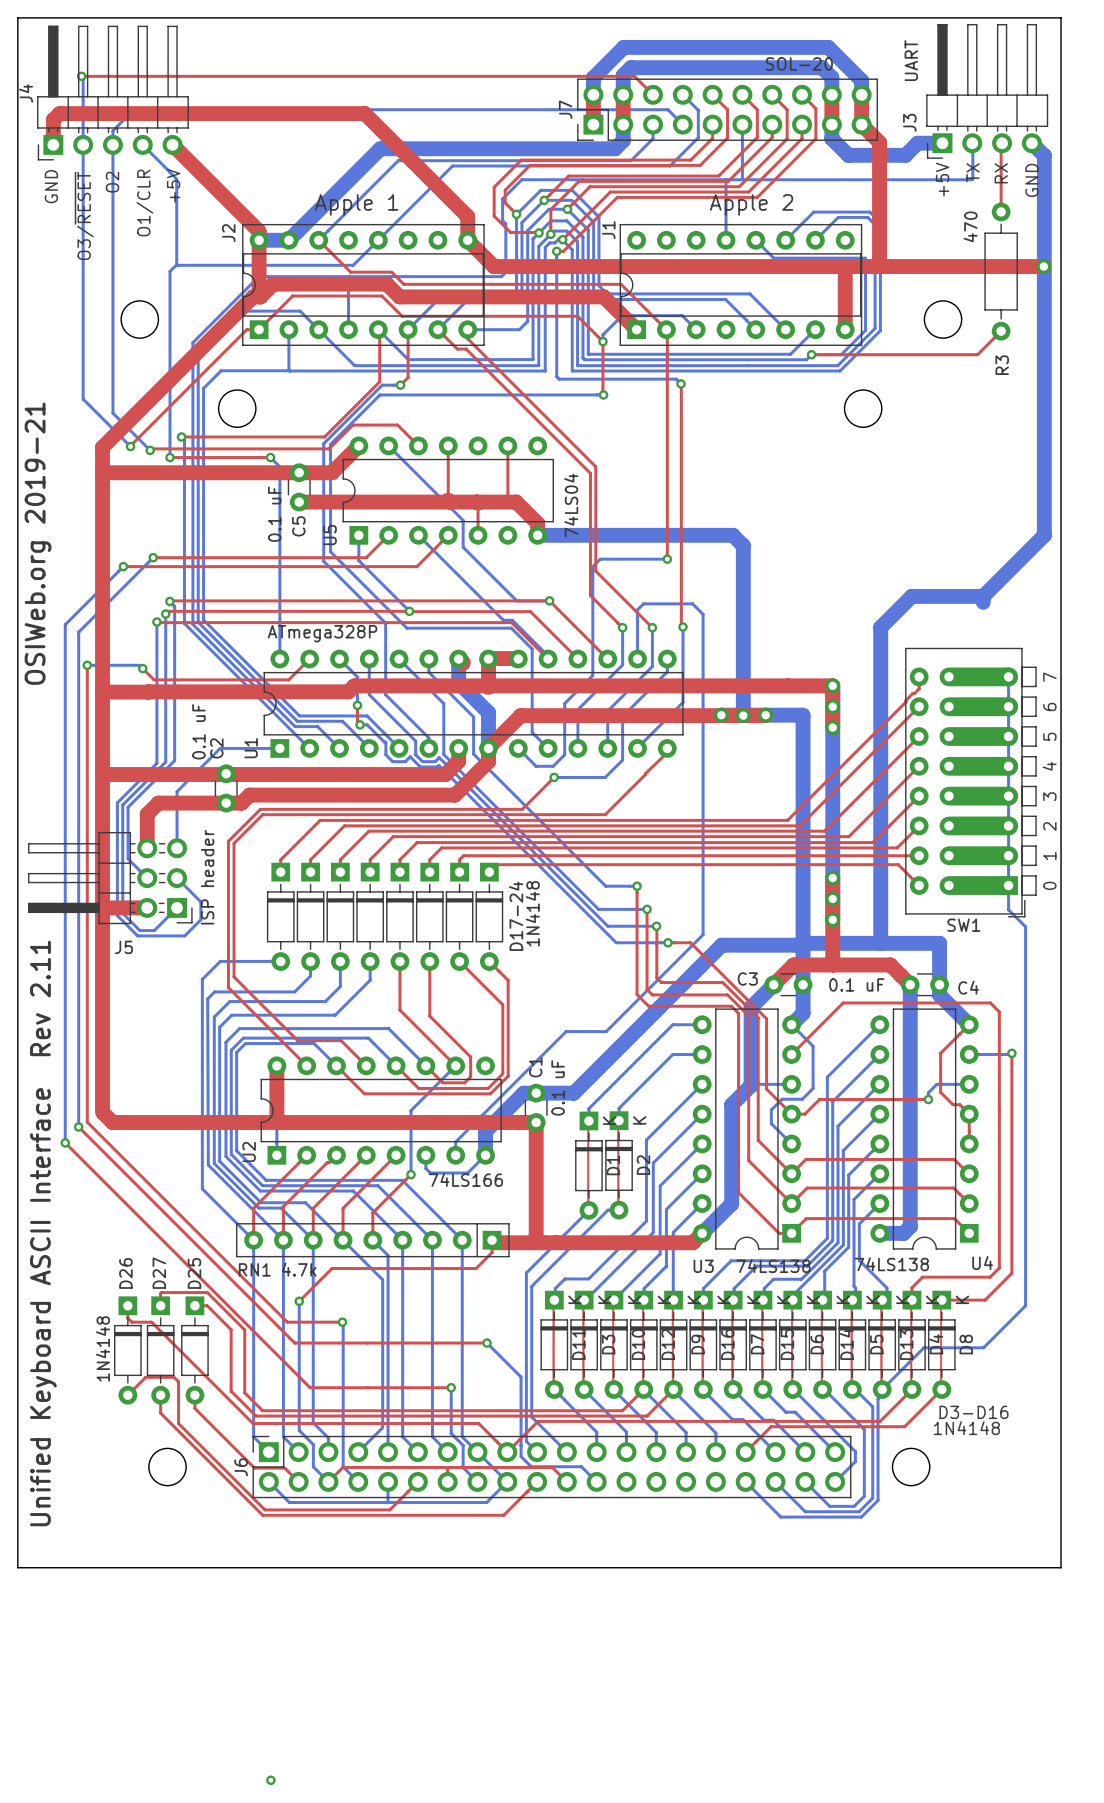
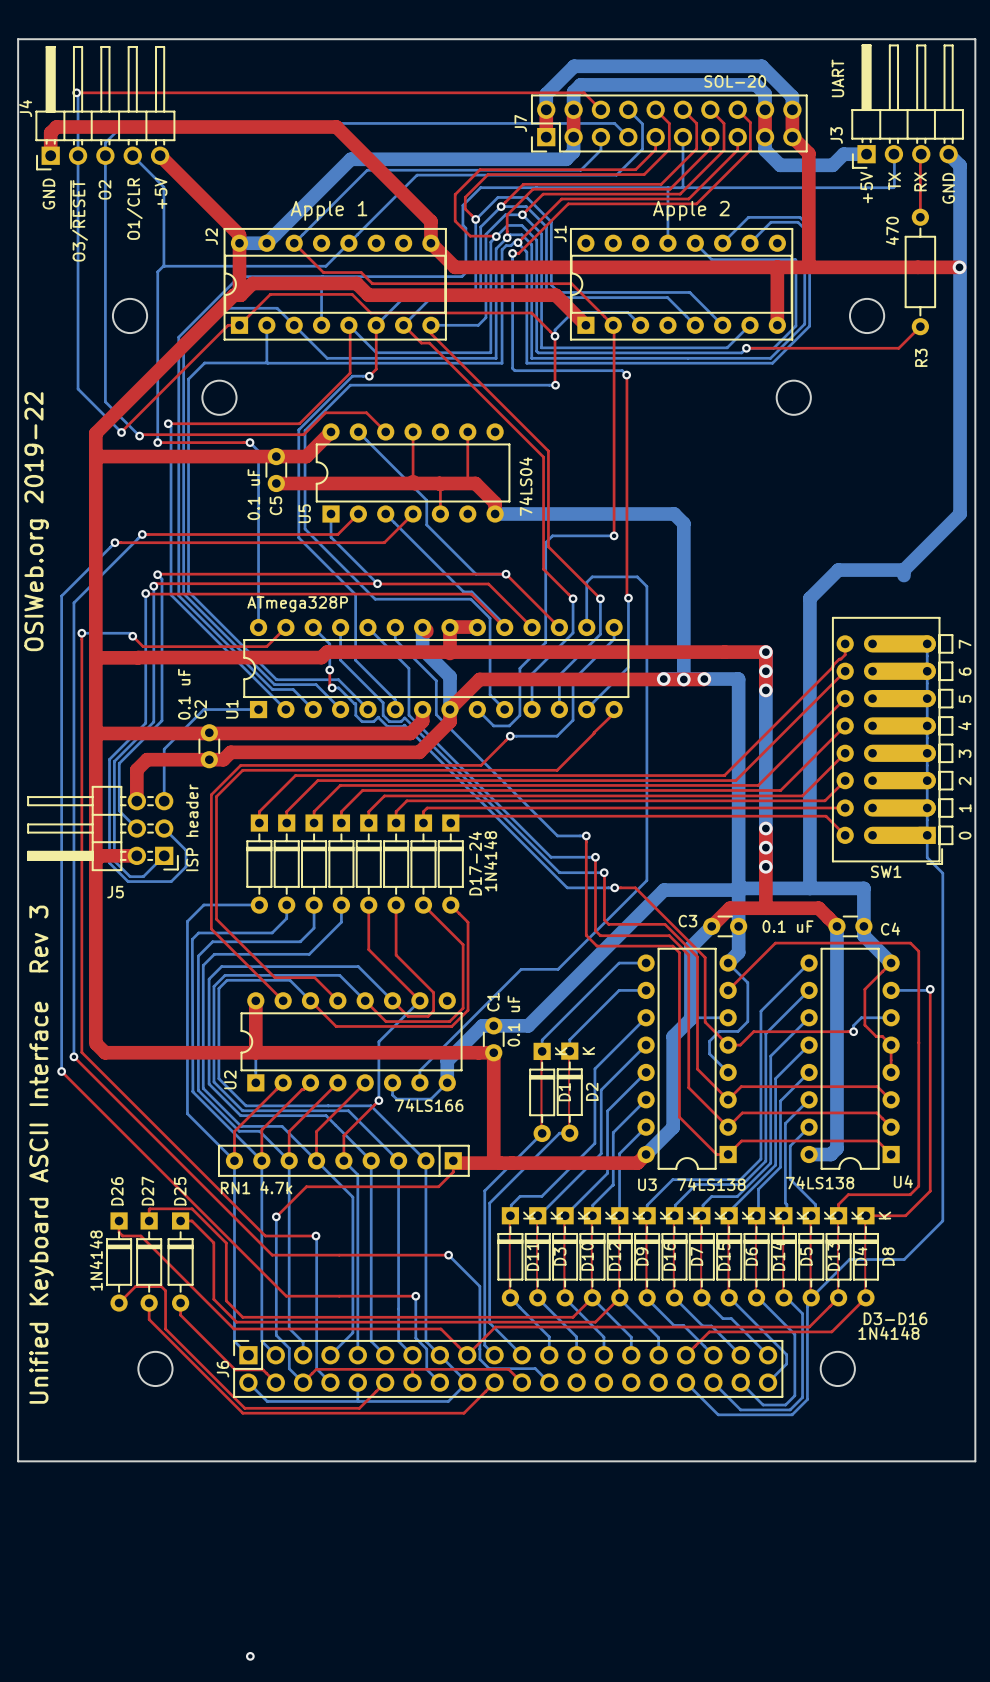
text: OSIWeb.org 2019-21 (38, 543) -> OSIWeb.org 2019-22 (36, 521)
text: Unified Keyboard ASCII Interface Rev 2.11 (43, 1233) -> Unified Keyboard ASCII Interface Rev 3 (41, 1154)

